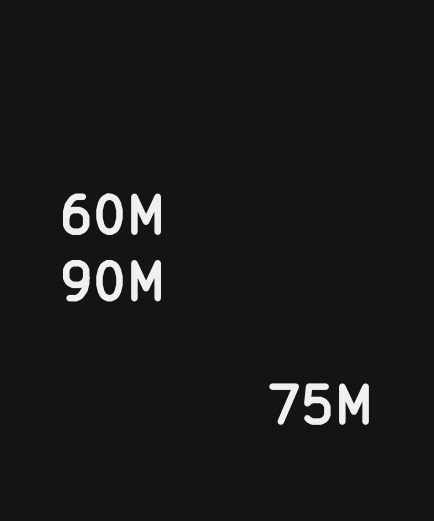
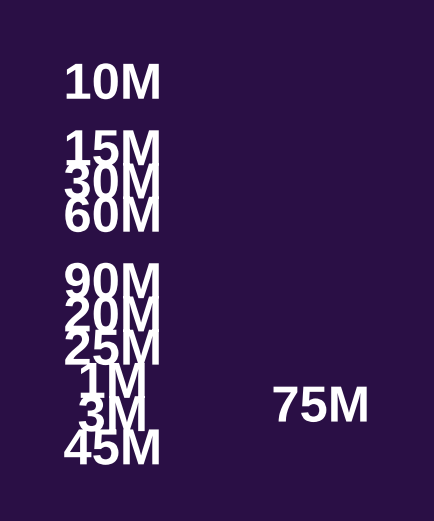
text: none -> 10M (112, 81)
text: none -> 15M (112, 148)
text: none -> 30M (111, 181)
text: none -> 20M (111, 313)
text: none -> 25M (111, 347)
text: none -> 1M (112, 380)
text: none -> 3M (111, 413)
text: none -> 45M (111, 447)

